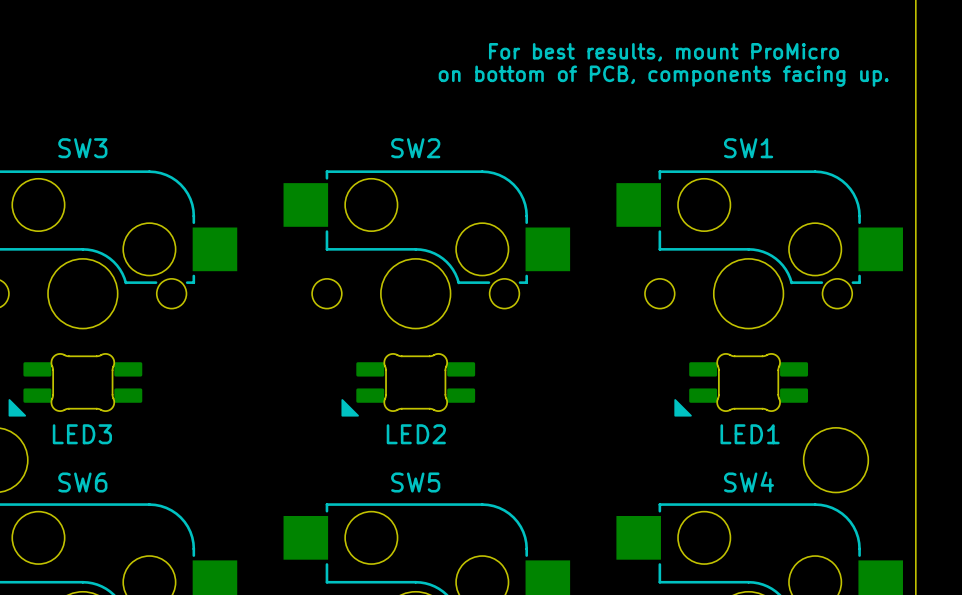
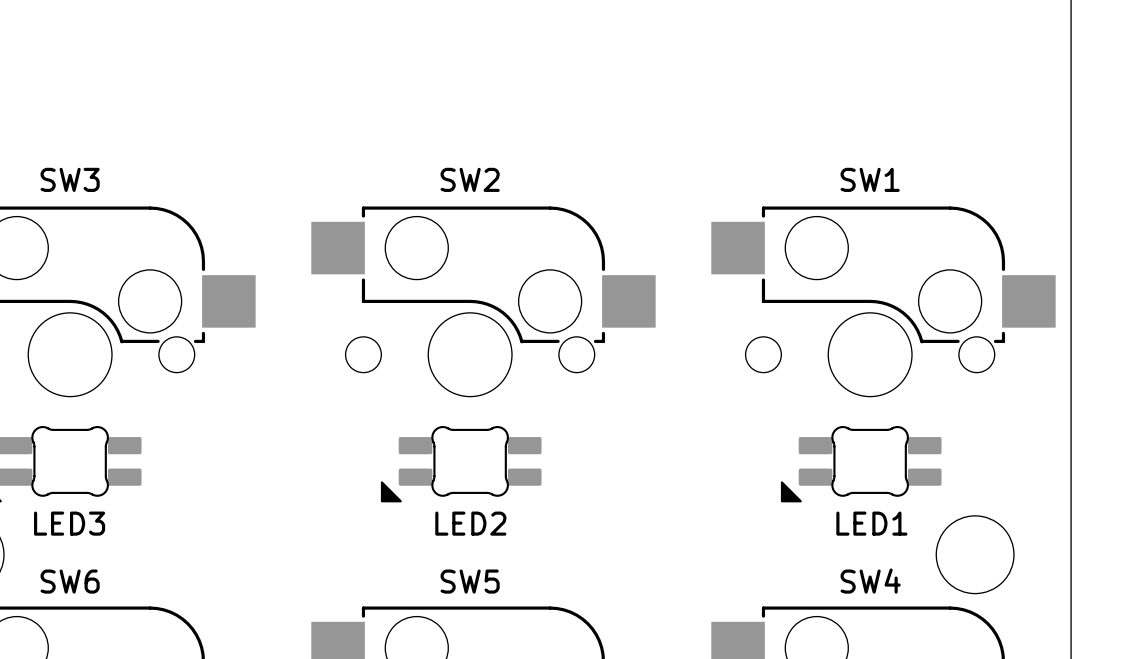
text: For best results, mount ProMicro (664, 52) -> none
text: on bottom of PCB, components facing up. (663, 76) -> none

